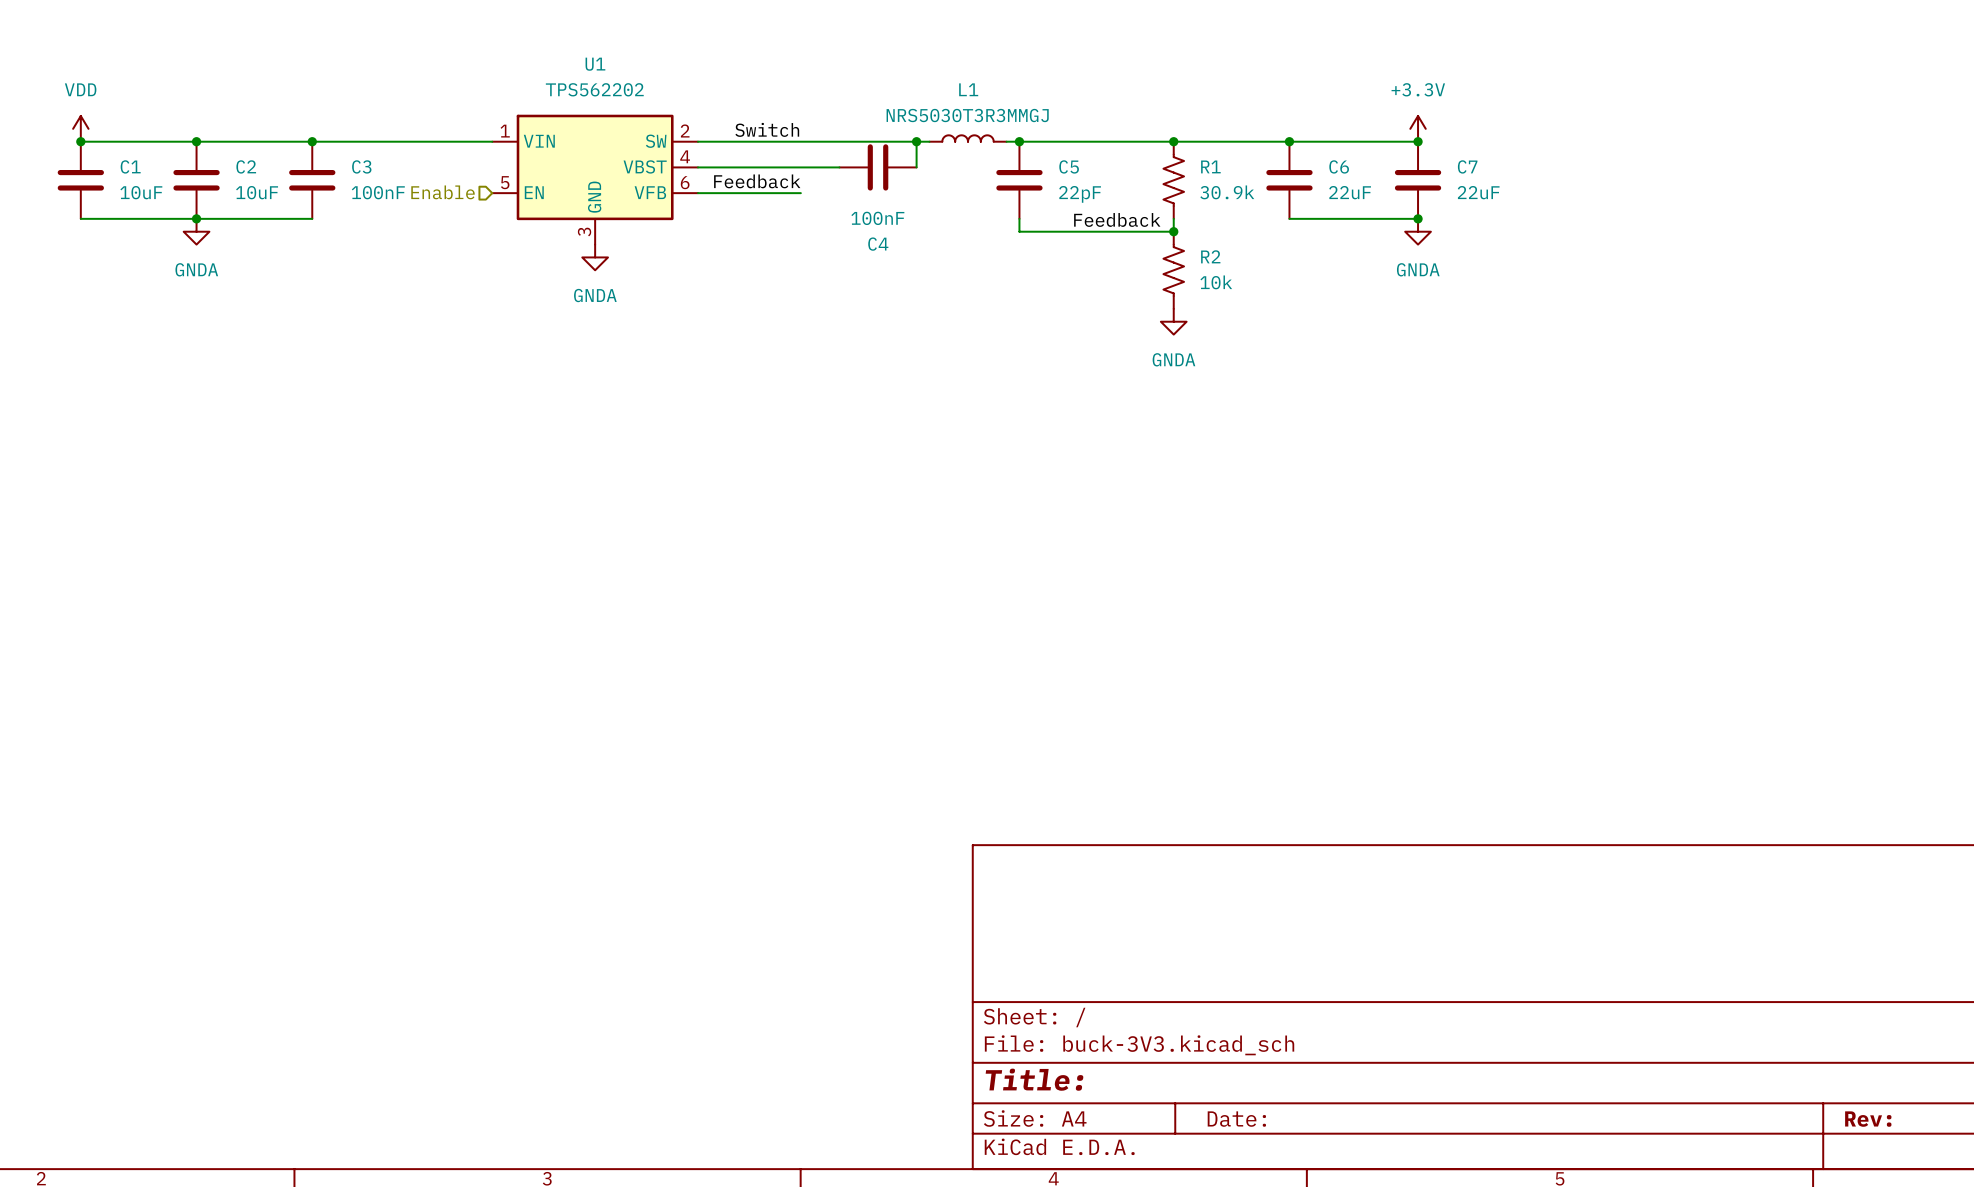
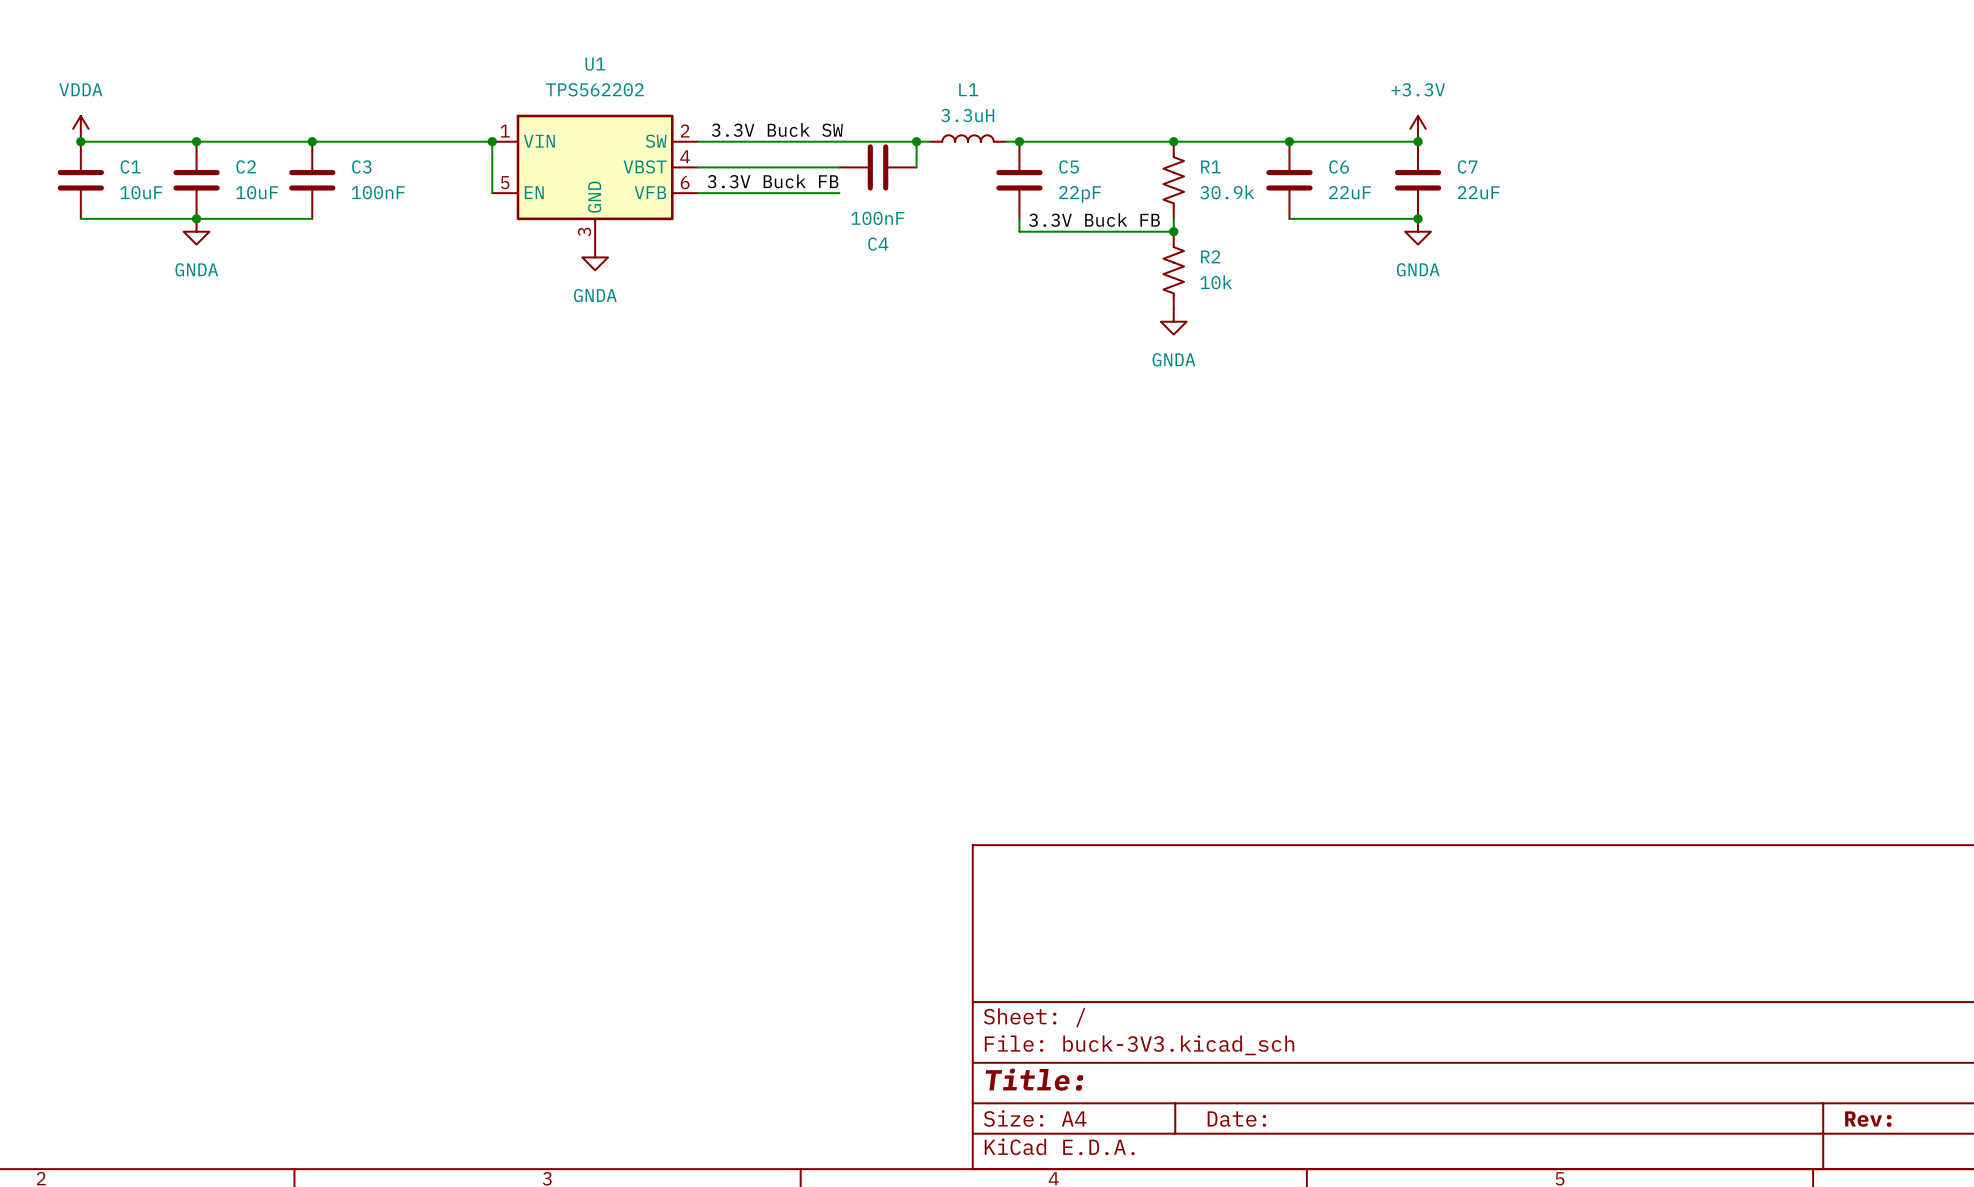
L1 value: NRS5030T3R3MMGJ (967, 115) -> 3.3uH (967, 115)
power symbol: VDD (80, 128) -> VDDA (80, 128)
label: Switch (767, 129) -> none
label: none -> 3.3V Buck SW (777, 129)
wire: none -> (492, 141) (492, 193)
junction: none -> (492, 141)
label: Feedback (757, 181) -> none
label: none -> 3.3V Buck FB (773, 181)
hierarchical label: Enable (443, 192) -> none
wire: none -> (800, 193) (839, 193)
label: Feedback (1117, 219) -> 3.3V Buck FB (1094, 219)

